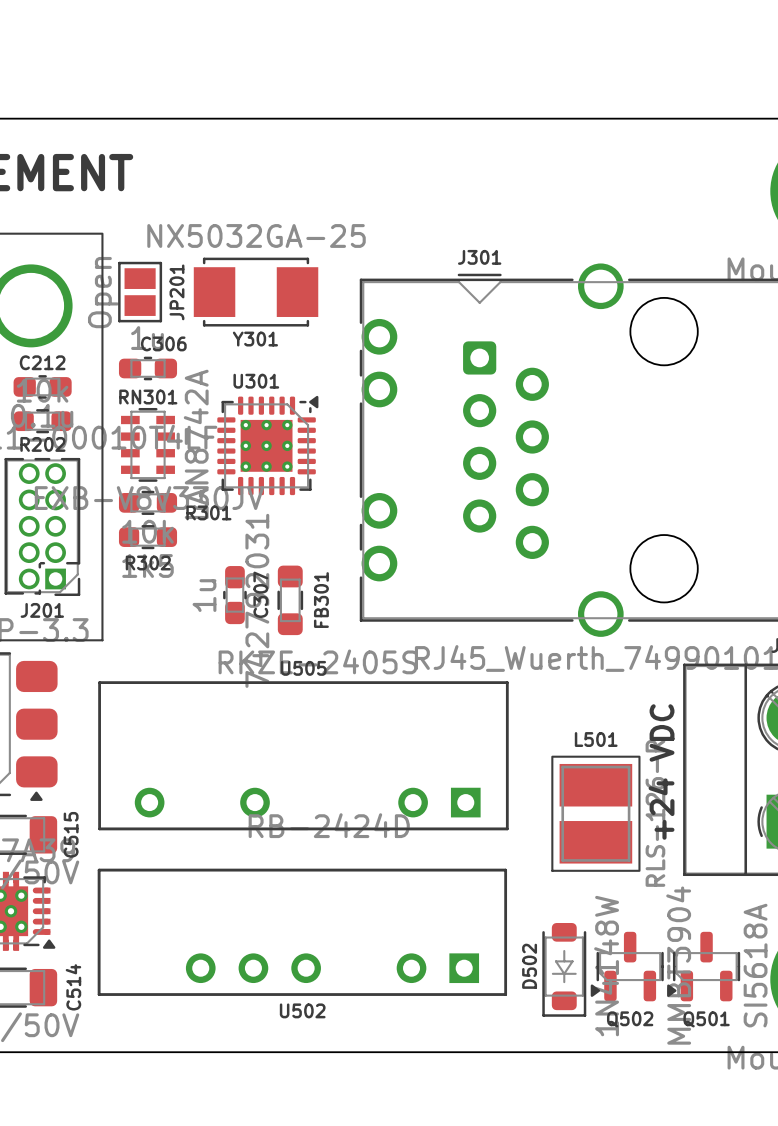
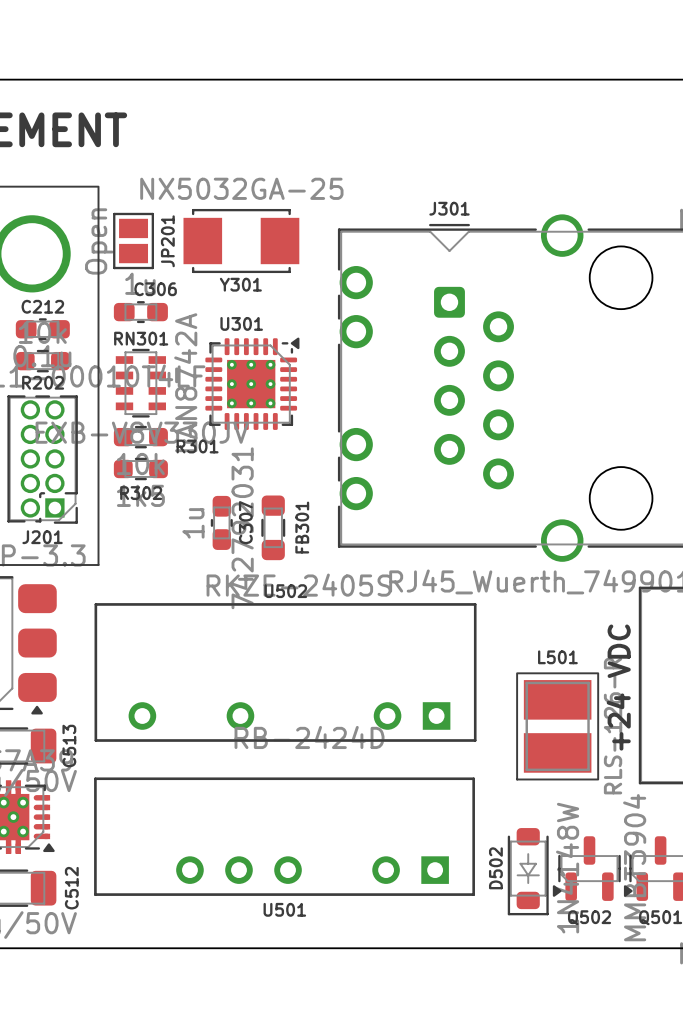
U505 name: U505 (303, 668) -> U502 (285, 591)
C515 name: C515 (71, 834) -> C513 (69, 746)
C514 name: C514 (73, 987) -> C512 (71, 888)
U502 name: U502 (302, 1010) -> U501 (284, 909)

